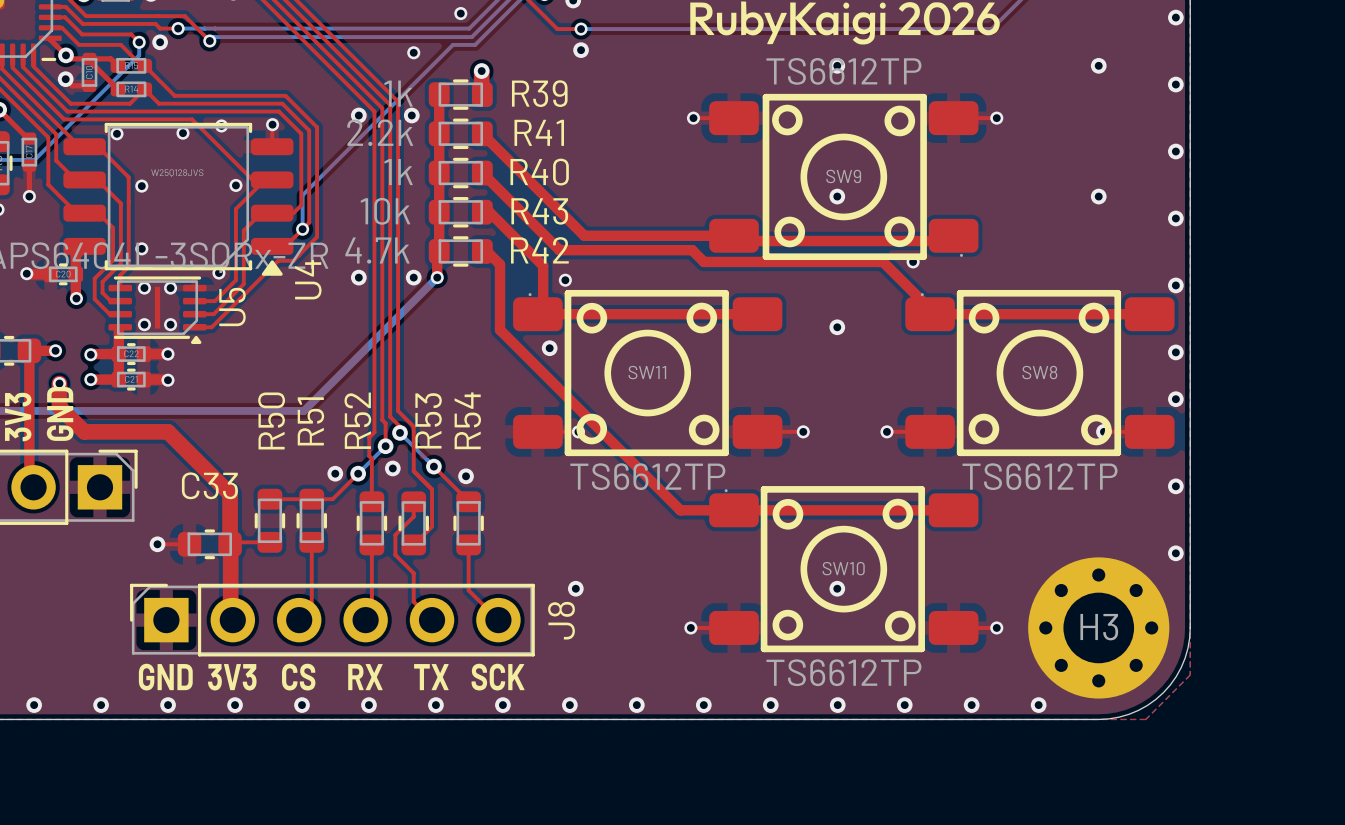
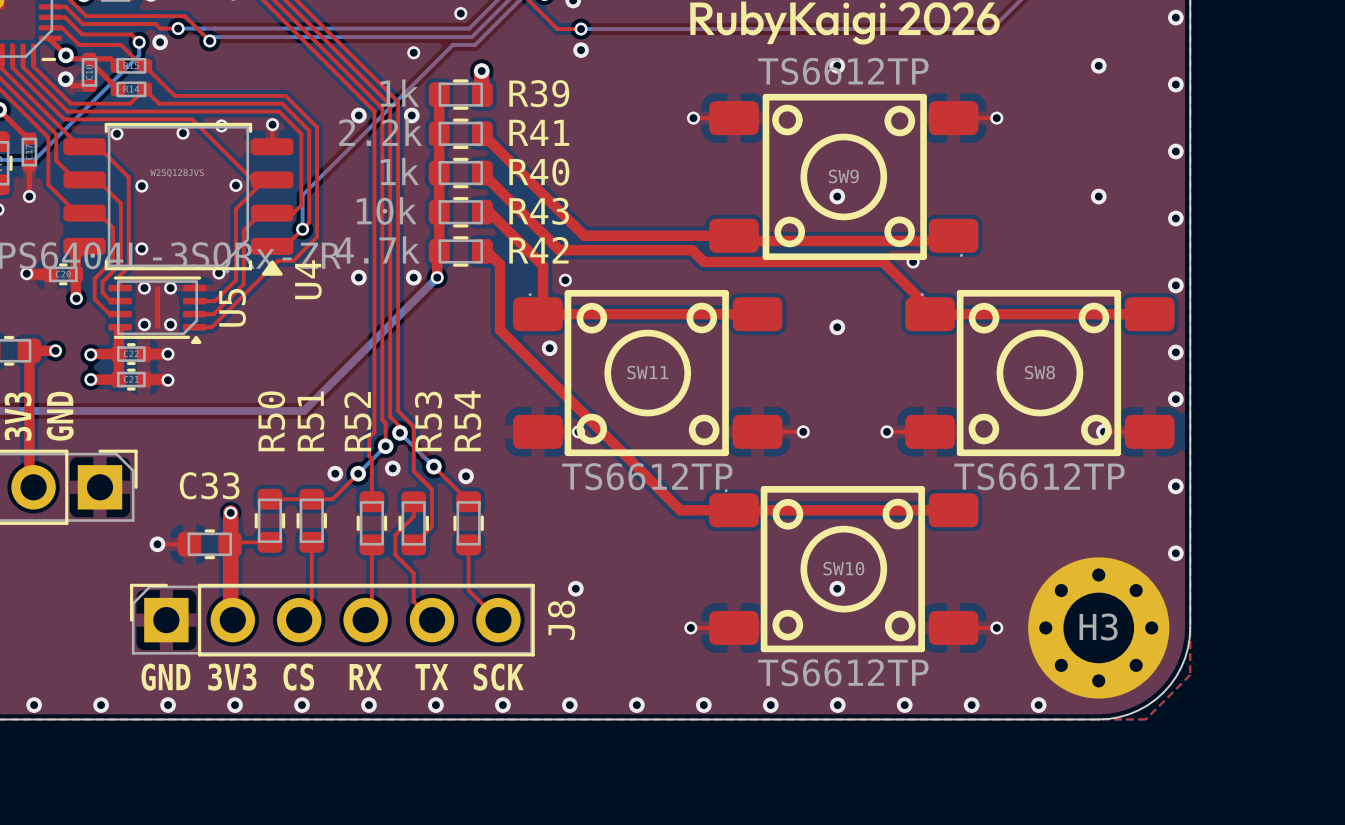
top track: (59, 383) (59, 407) (84, 431) (167, 431) (230, 493) (230, 544) -> (230, 512) (230, 543)
via: (59, 383) -> none
via: none -> (230, 512)

